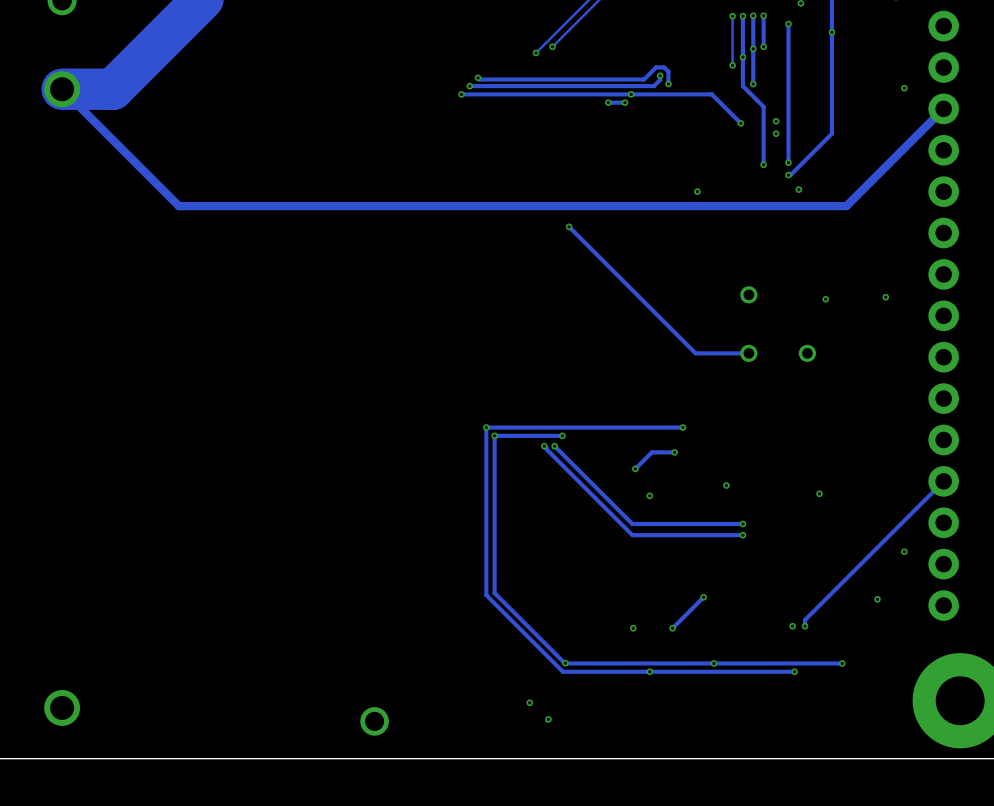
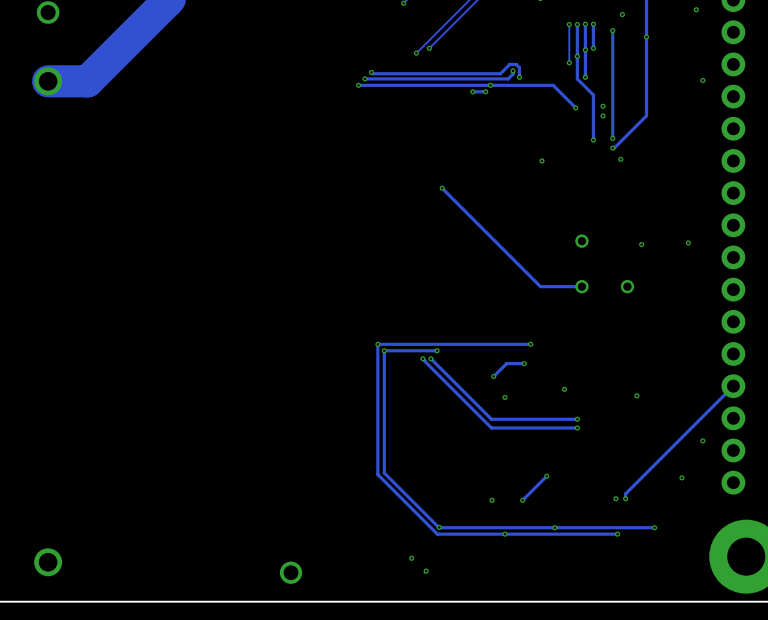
track: (62, 89) (179, 206) (846, 206) (943, 108) -> none

